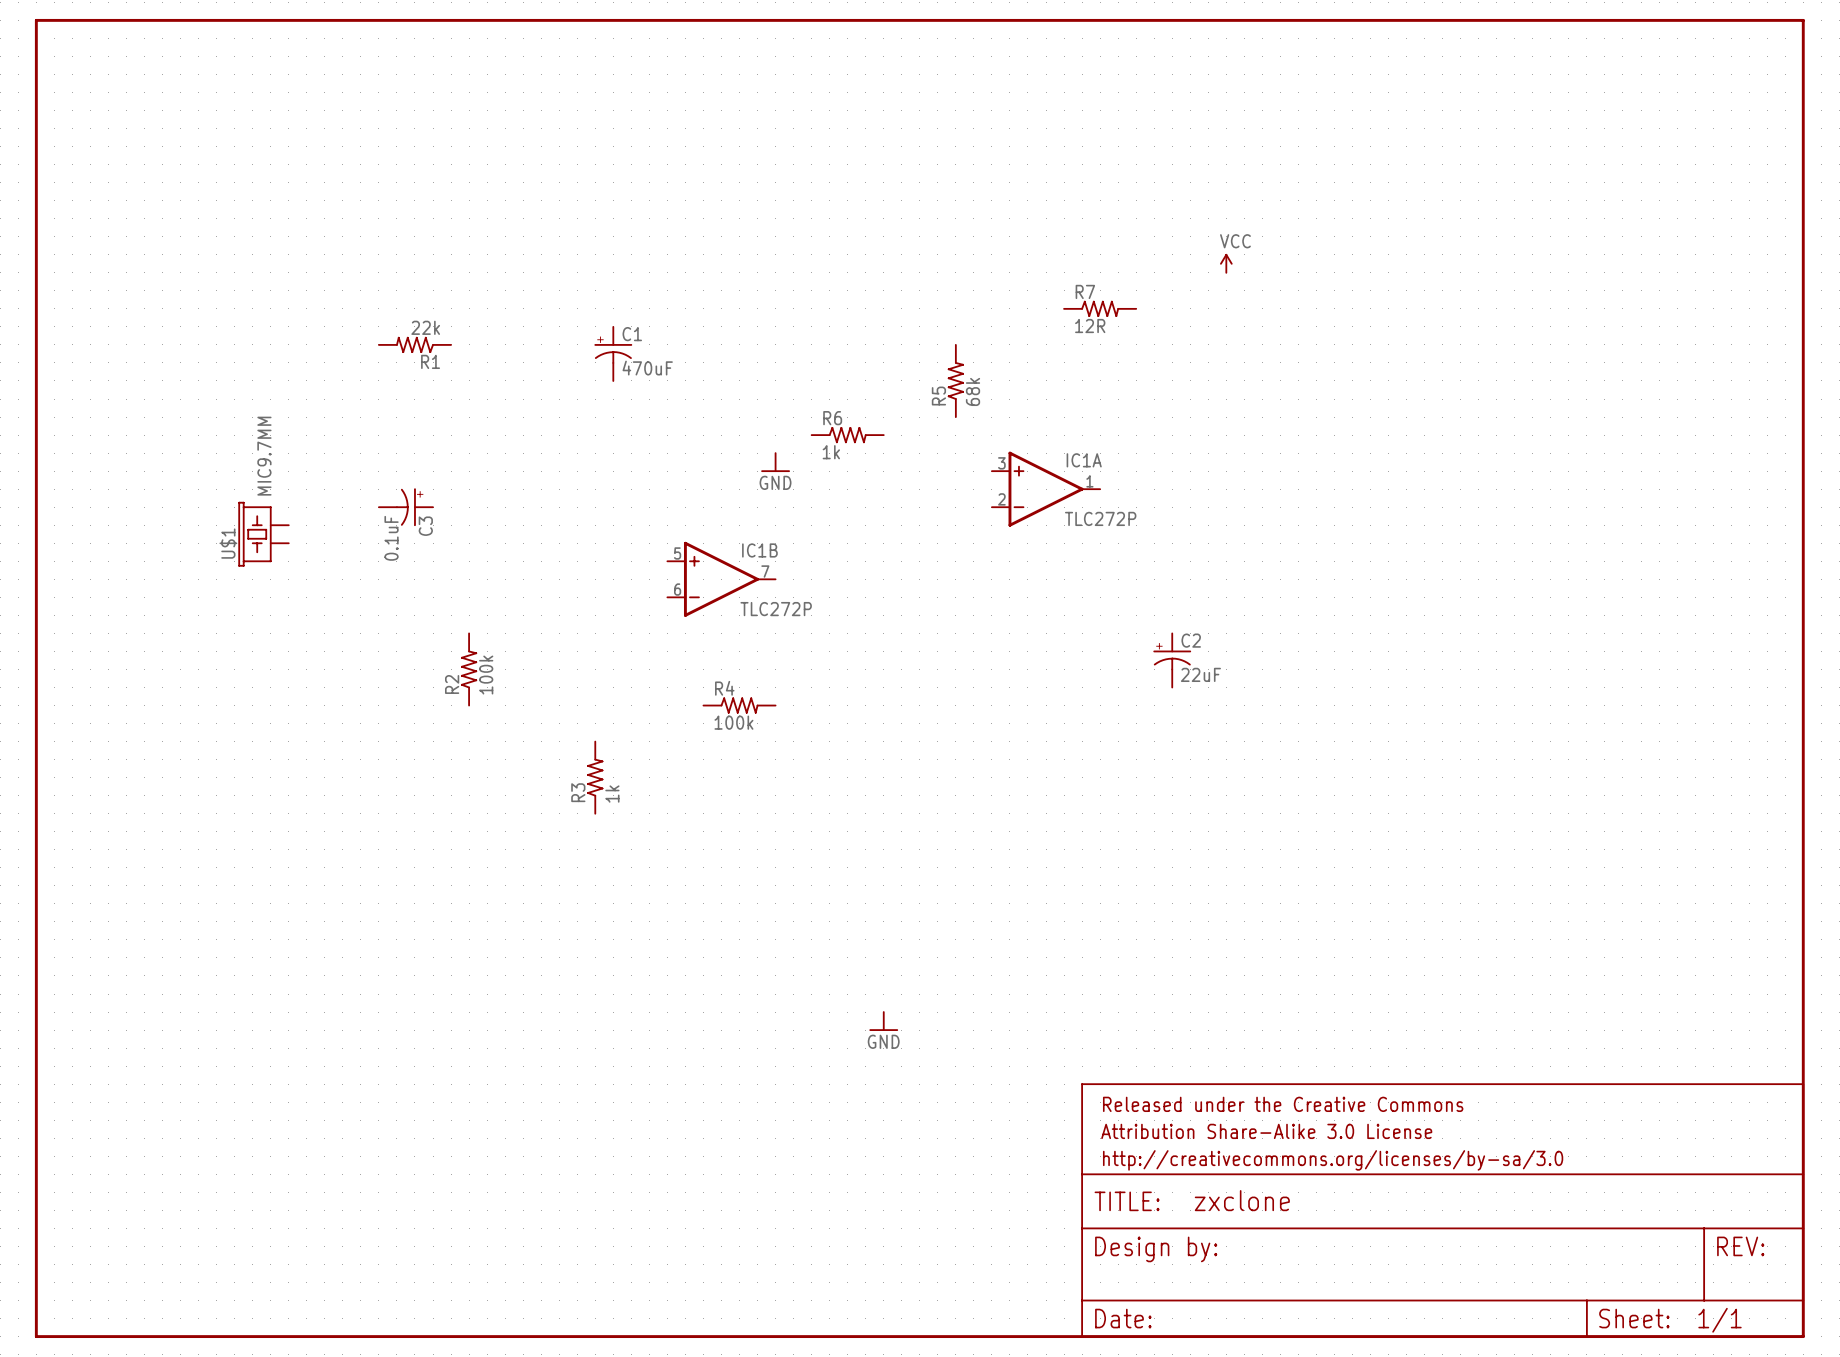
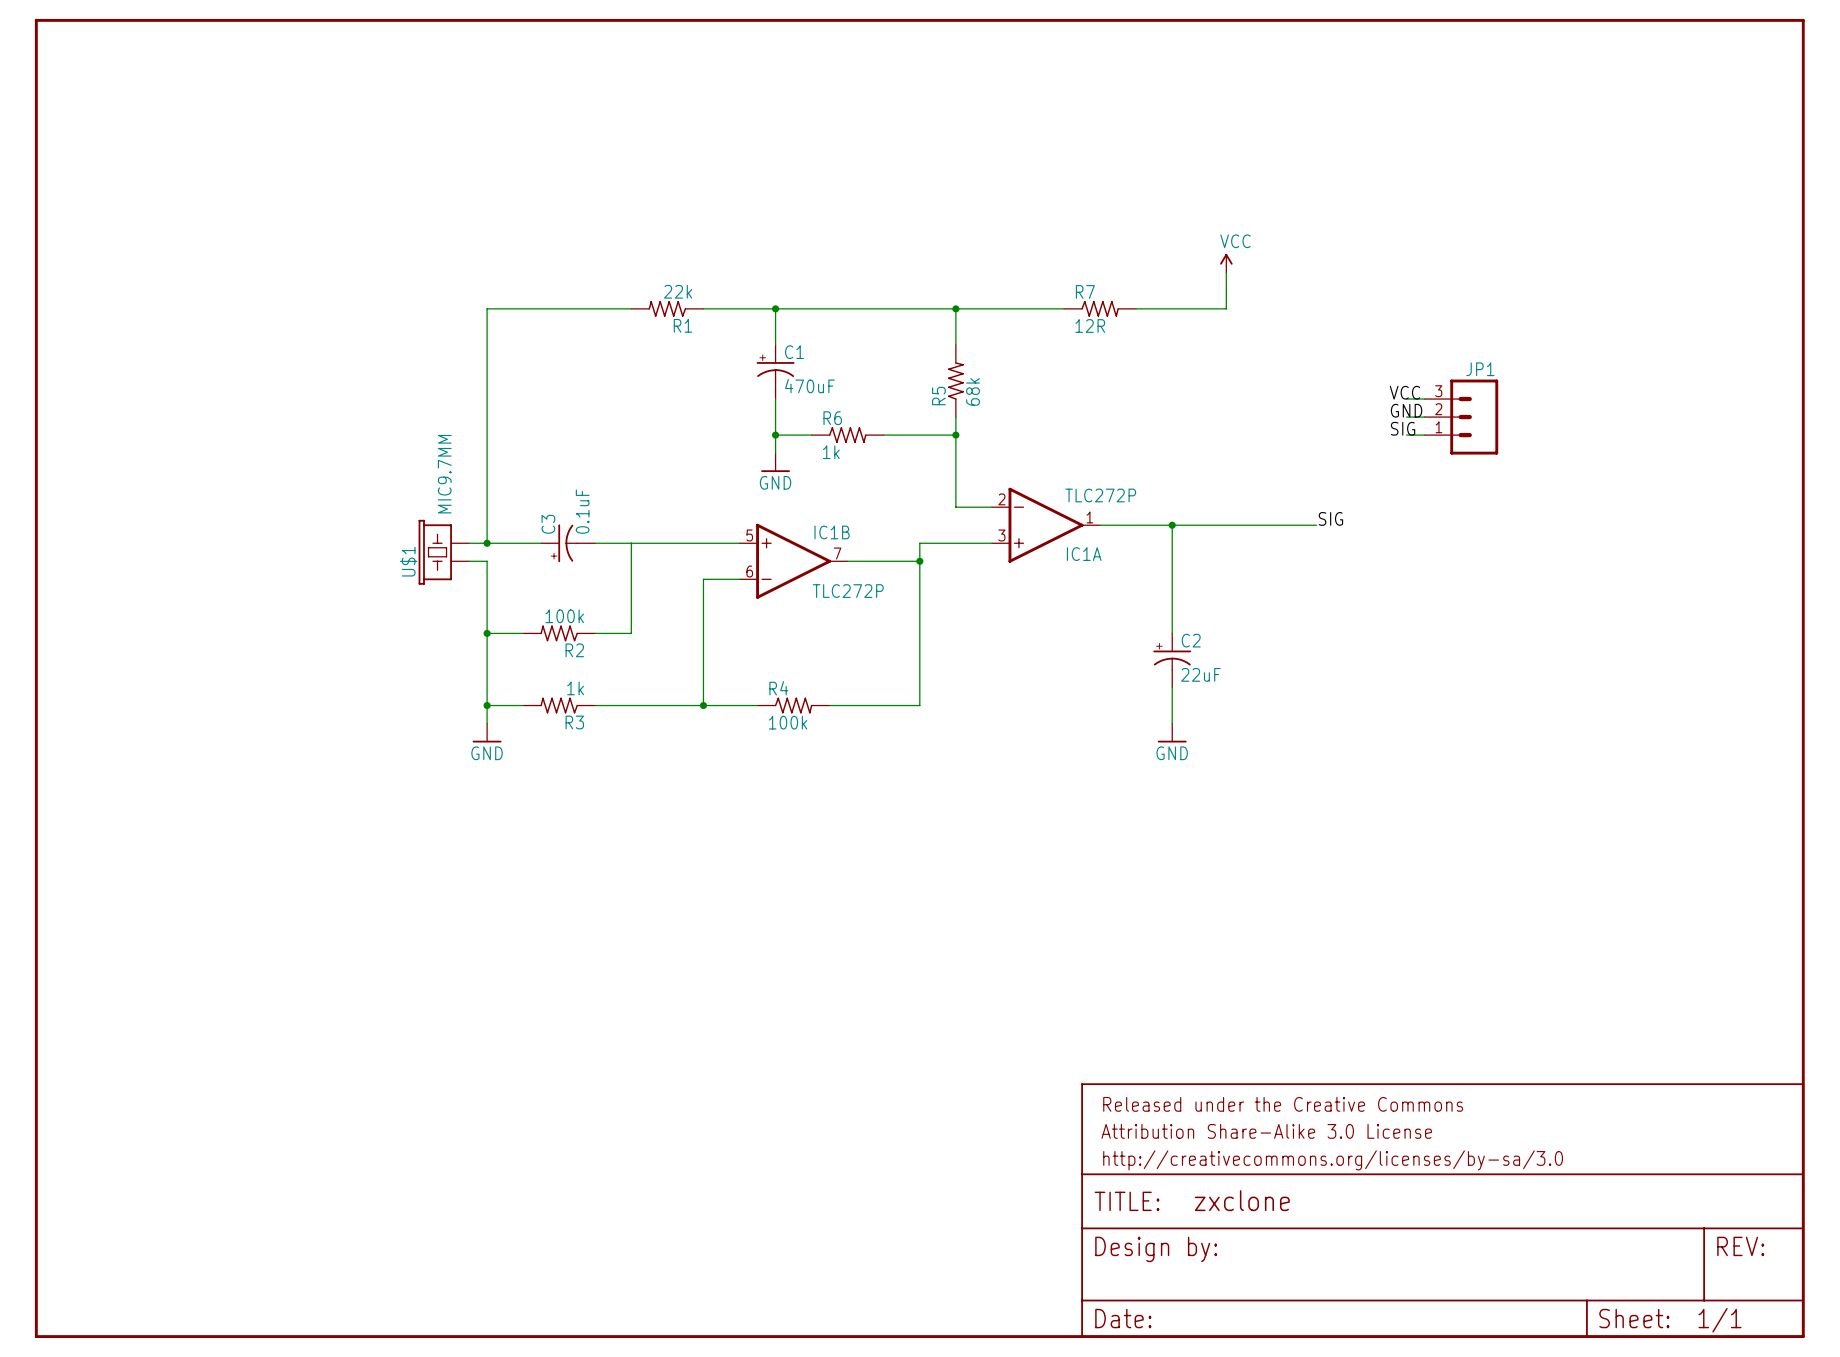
wire: none -> (1226, 272) (1226, 308) (1136, 308)
wire: none -> (631, 308) (487, 308) (487, 543)
wire: none -> (703, 308) (1064, 308)
wire: none -> (775, 308) (775, 344)
junction: none -> (775, 308)
wire: none -> (955, 308) (955, 344)
junction: none -> (955, 308)
R1 position: (414, 344) -> (667, 308)
C1 position: (613, 353) -> (775, 371)
label: none -> VCC (1404, 392)
wire: none -> (775, 399) (775, 453)
wire: none -> (1406, 399) (1424, 399)
label: none -> GND (1406, 410)
wire: none -> (955, 417) (955, 507) (991, 507)
wire: none -> (1406, 417) (1424, 417)
JP1: none -> (1461, 417)
label: none -> SIG (1403, 428)
wire: none -> (775, 435) (811, 435)
junction: none -> (775, 435)
wire: none -> (883, 435) (955, 435)
junction: none -> (955, 435)
wire: none -> (1406, 435) (1424, 435)
IC1A flip: as is (1046, 489) -> up-down (1046, 525)
C3 position: (405, 507) -> (568, 543)
C3 rotation: 0° (409, 507) -> 180° (564, 543)
label: none -> SIG (1330, 518)
wire: none -> (1100, 525) (1316, 525)
wire: none -> (1172, 525) (1172, 633)
junction: none -> (1172, 525)
U$1 position: (263, 534) -> (443, 552)
wire: none -> (469, 543) (541, 543)
junction: none -> (487, 543)
wire: none -> (595, 543) (739, 543)
wire: none -> (631, 543) (631, 633) (595, 633)
wire: none -> (991, 543) (919, 543) (919, 705) (829, 705)
wire: none -> (469, 561) (487, 561) (487, 723)
wire: none -> (847, 561) (919, 561)
junction: none -> (919, 561)
IC1B position: (721, 579) -> (793, 561)
wire: none -> (739, 579) (703, 579) (703, 705)
wire: none -> (487, 633) (523, 633)
junction: none -> (487, 633)
R2 rotation: 0° (469, 669) -> 90° counterclockwise (559, 633)
R2 position: (469, 669) -> (559, 633)
wire: none -> (1172, 687) (1172, 723)
wire: none -> (487, 705) (523, 705)
junction: none -> (487, 705)
wire: none -> (595, 705) (757, 705)
junction: none -> (703, 705)
R4 position: (739, 705) -> (793, 705)
power symbol: none -> GND (487, 733)
power symbol: none -> GND (1172, 733)
R3 rotation: 0° (595, 777) -> 90° counterclockwise (559, 705)
R3 position: (595, 777) -> (559, 705)
power symbol: GND (883, 1021) -> none

